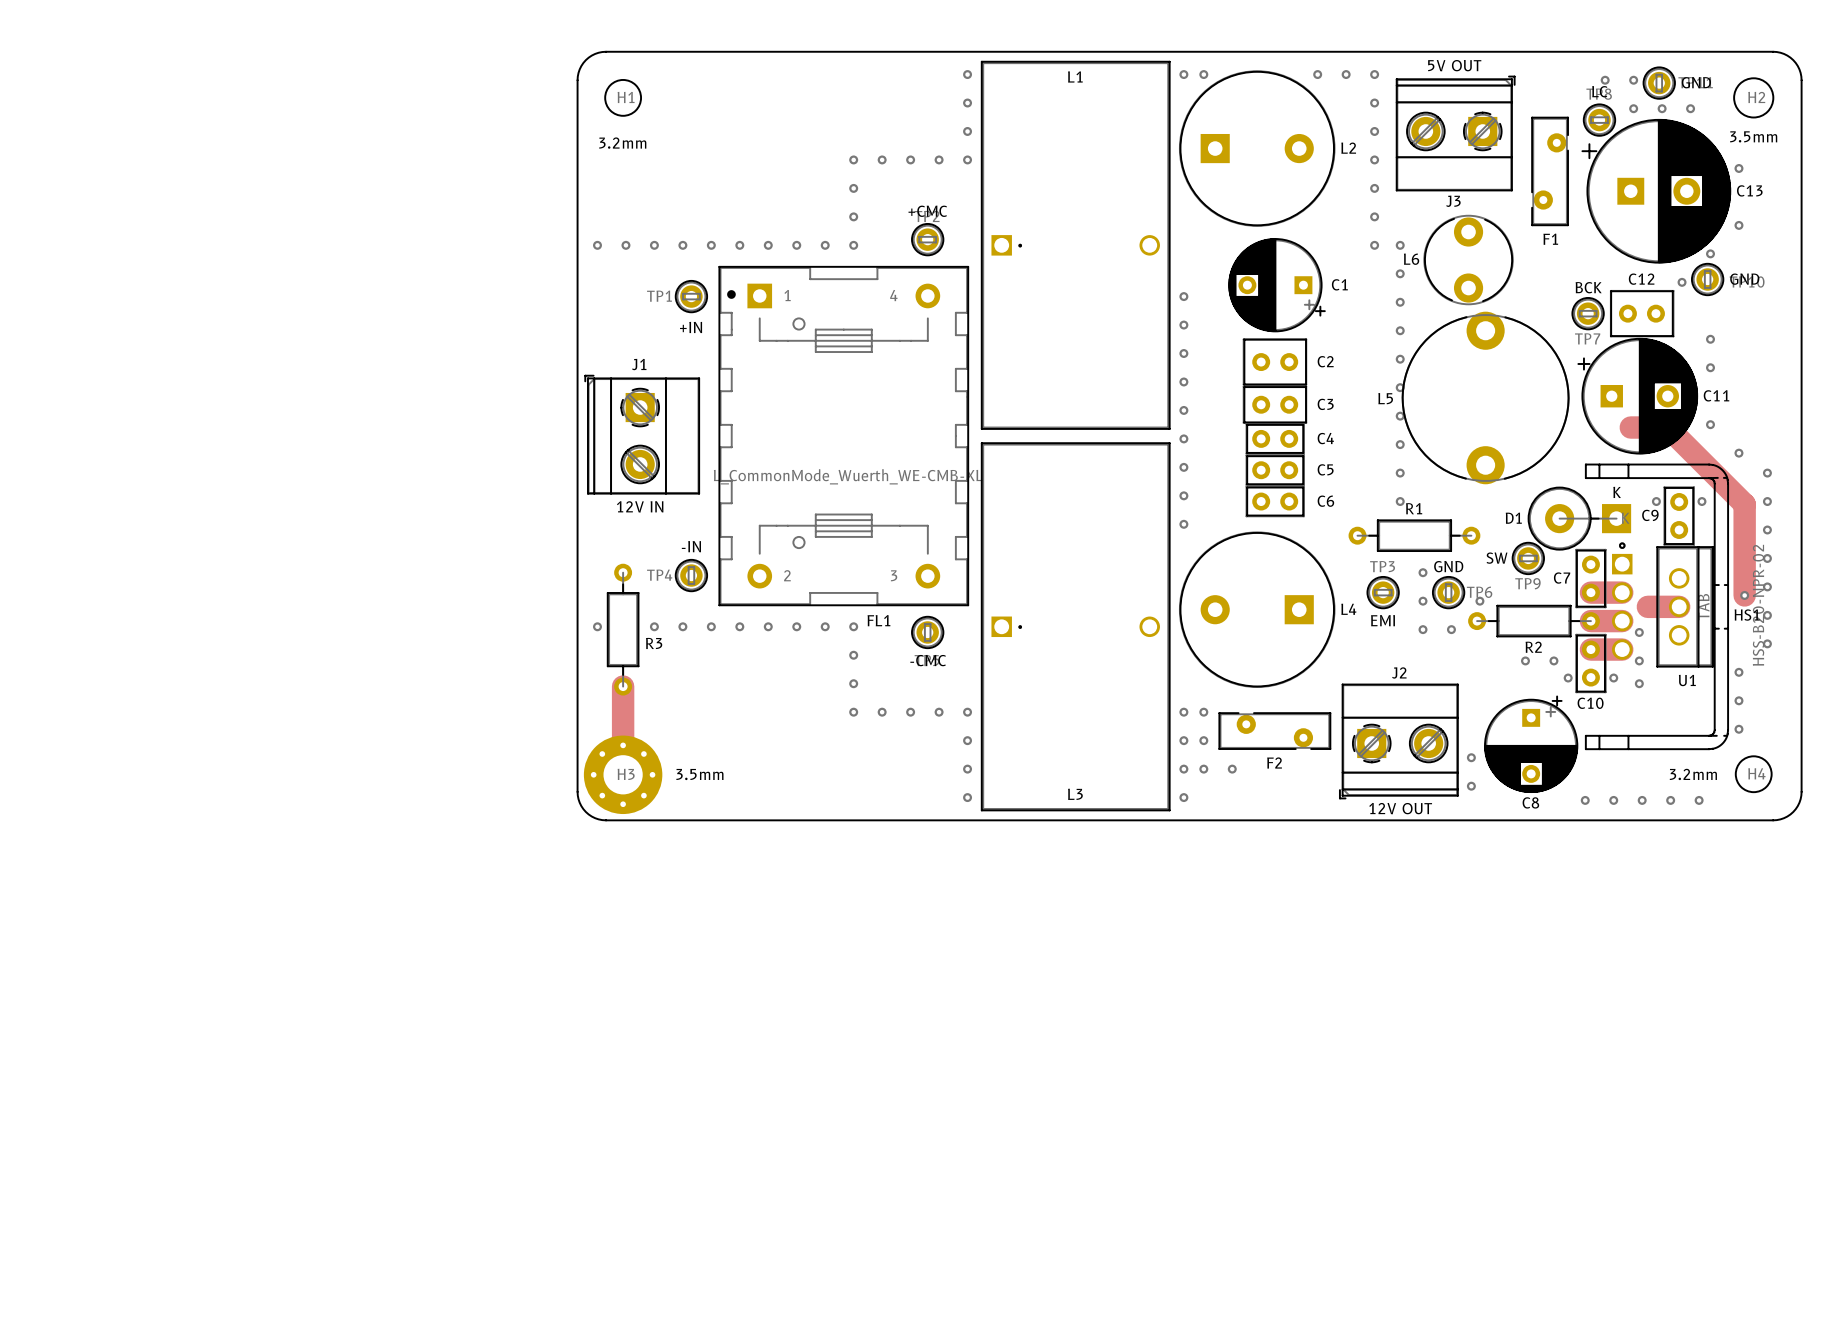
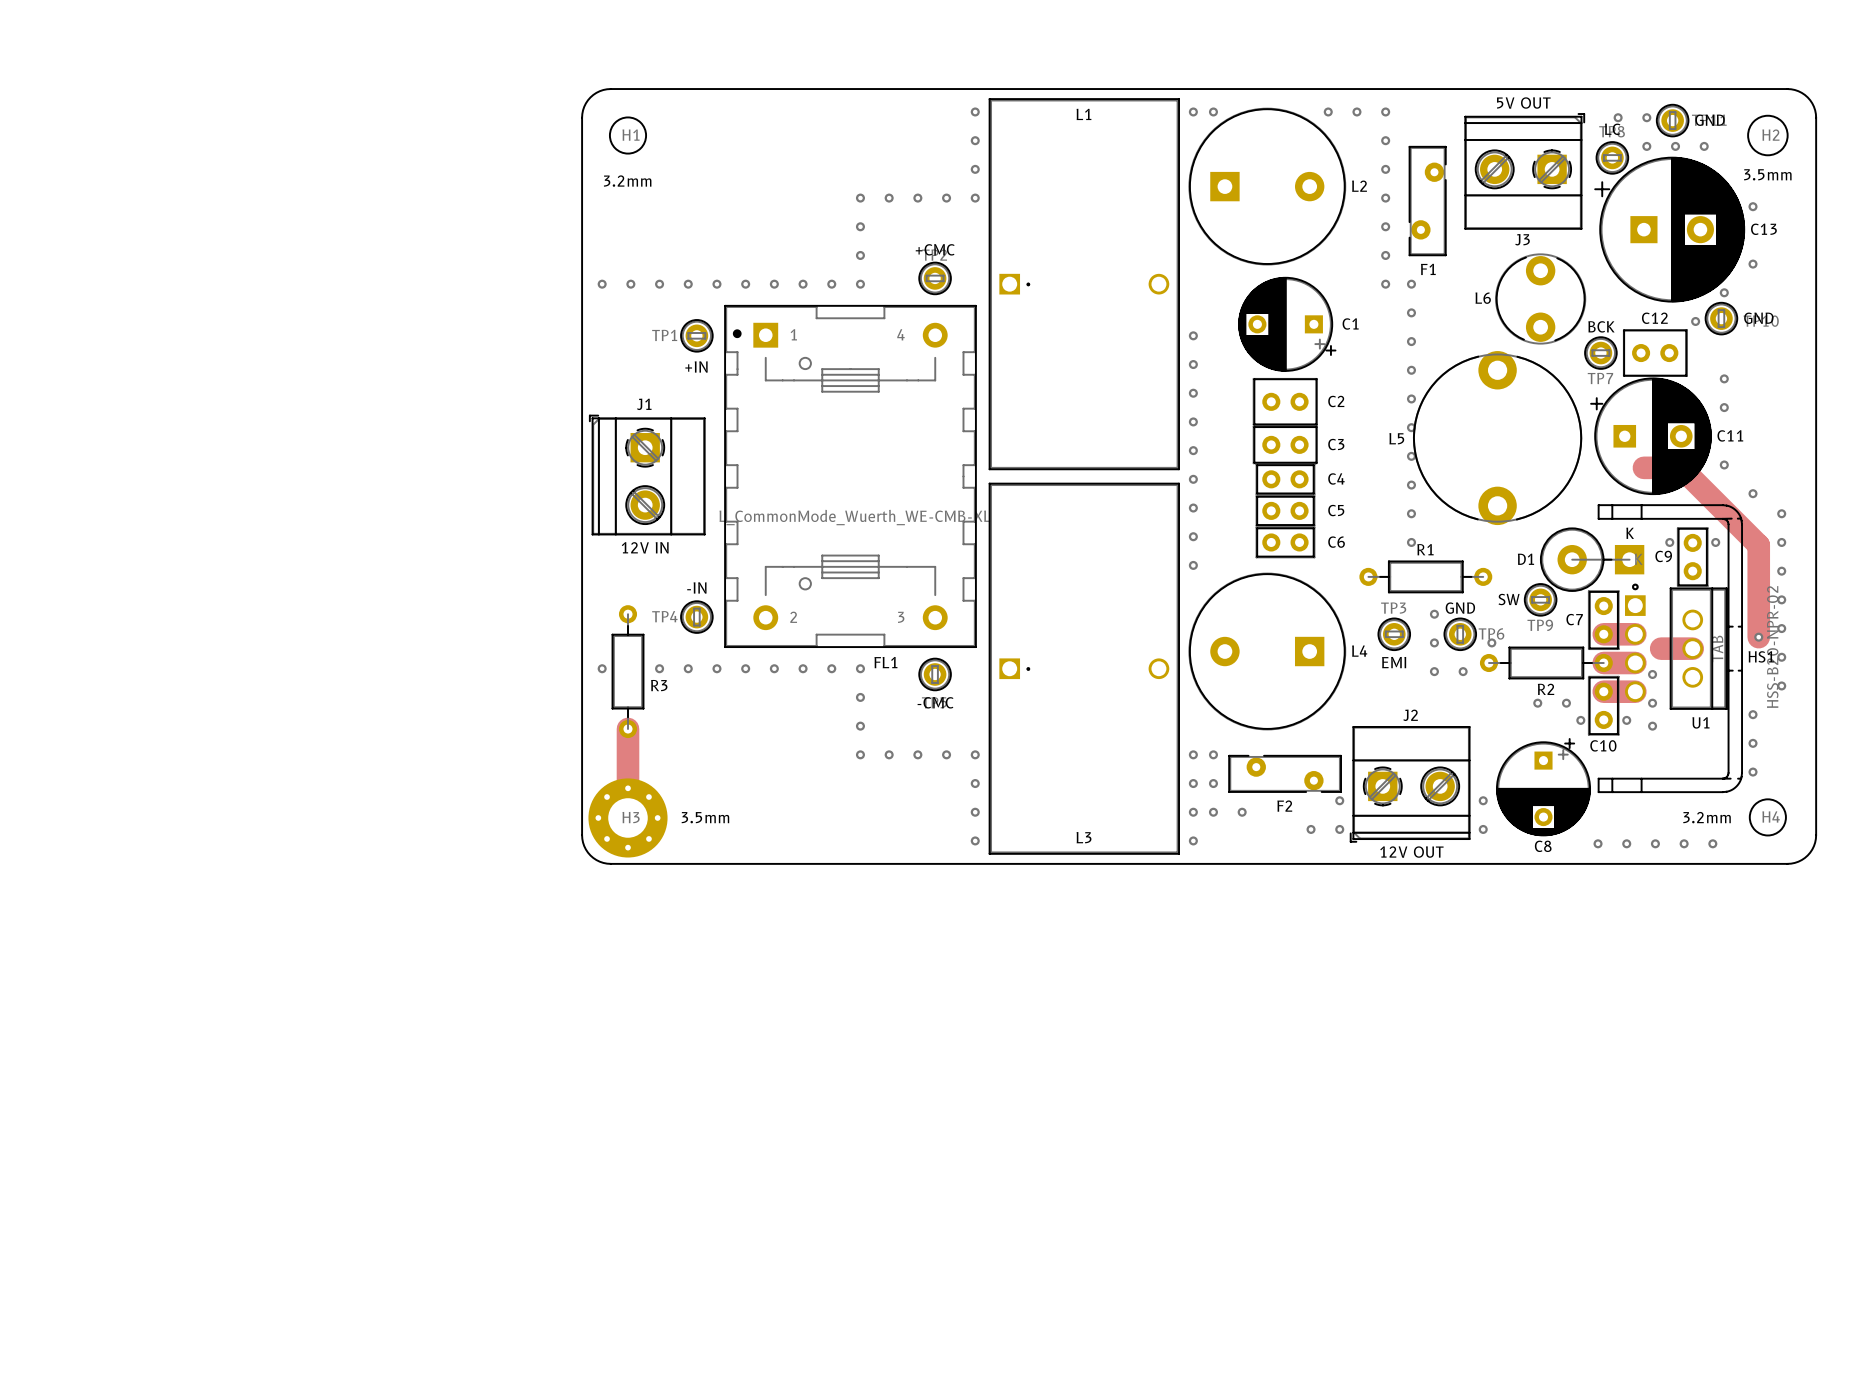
J3 position: (1455, 133) -> (1524, 171)
F1 position: (1550, 171) -> (1427, 201)
L6 position: (1468, 260) -> (1540, 298)
via: none -> (1339, 800)
via: none -> (1311, 829)
via: none -> (1339, 829)

